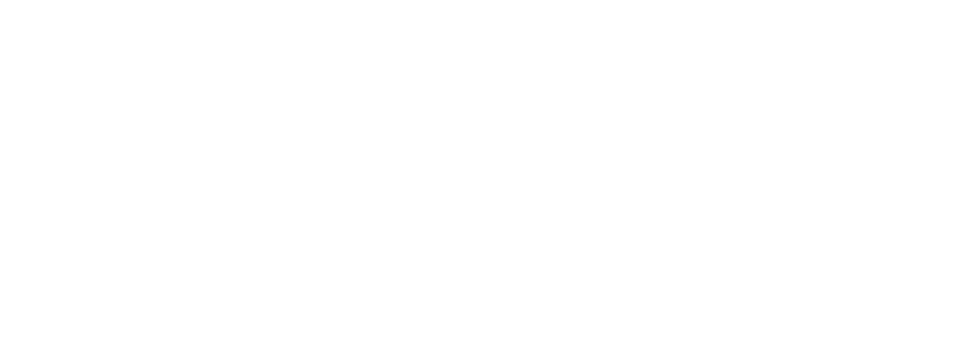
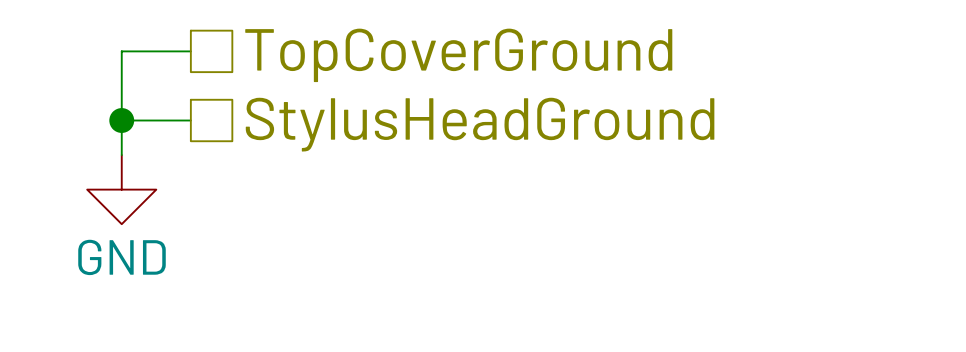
wire: none -> (190, 51) (121, 51) (121, 155)
hierarchical label: none -> TopCoverGround (458, 55)
wire: none -> (121, 120) (190, 120)
junction: none -> (121, 120)
hierarchical label: none -> StylusHeadGround (480, 124)
power symbol: none -> GND (121, 189)

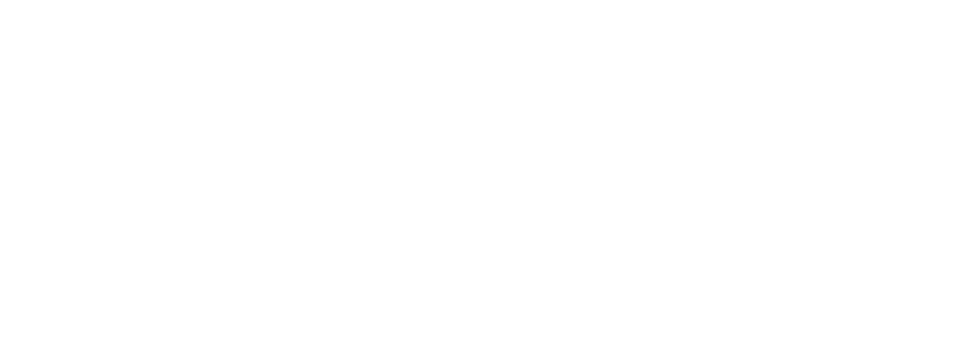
wire: (190, 51) (121, 51) (121, 155) -> none
hierarchical label: TopCoverGround (458, 55) -> none
wire: (121, 120) (190, 120) -> none
junction: (121, 120) -> none
hierarchical label: StylusHeadGround (480, 124) -> none
power symbol: GND (121, 189) -> none

